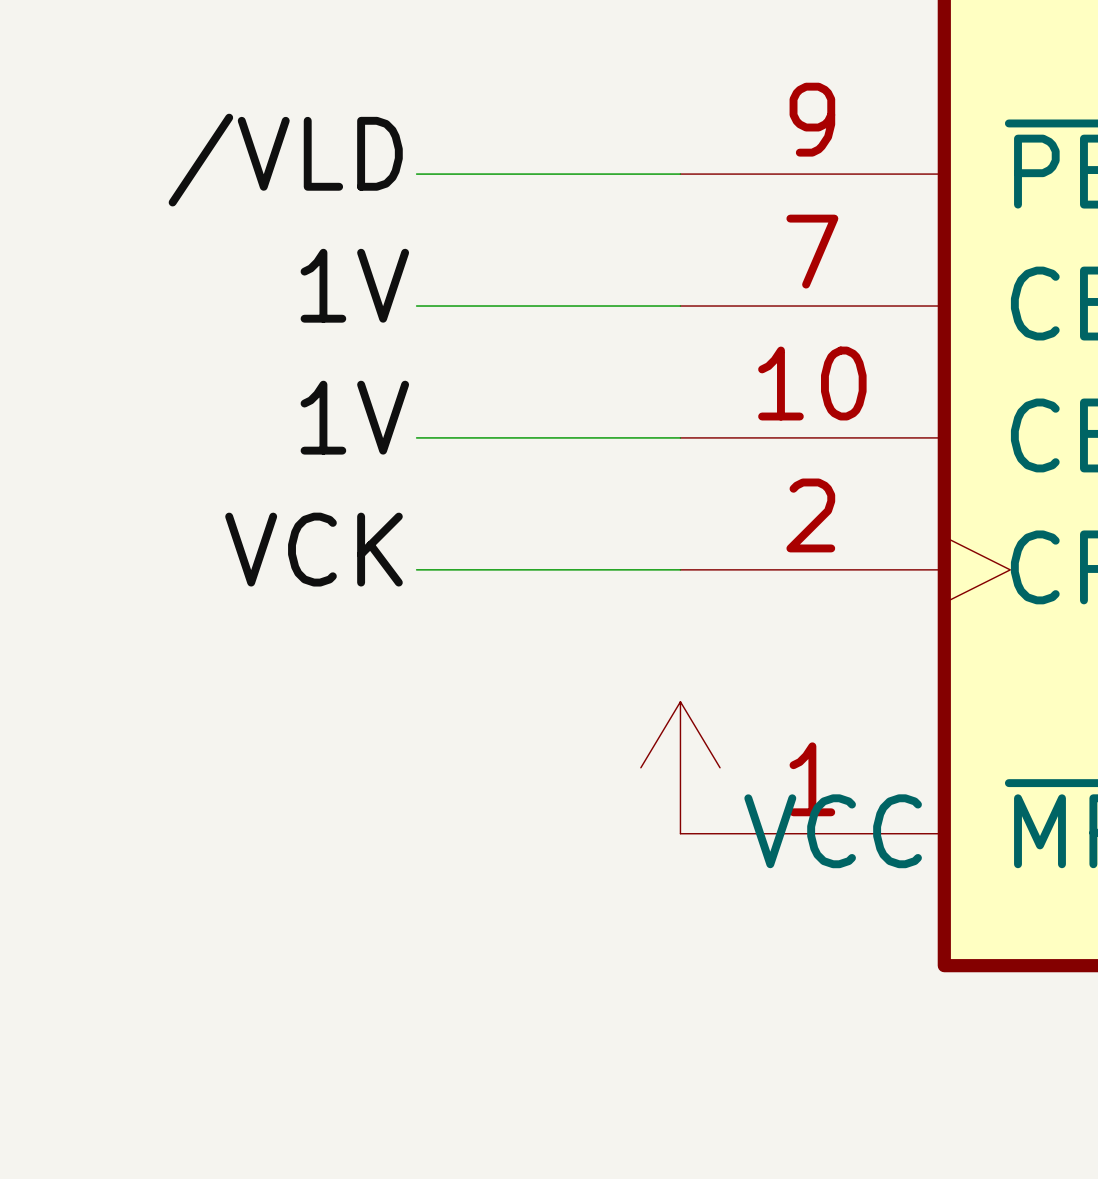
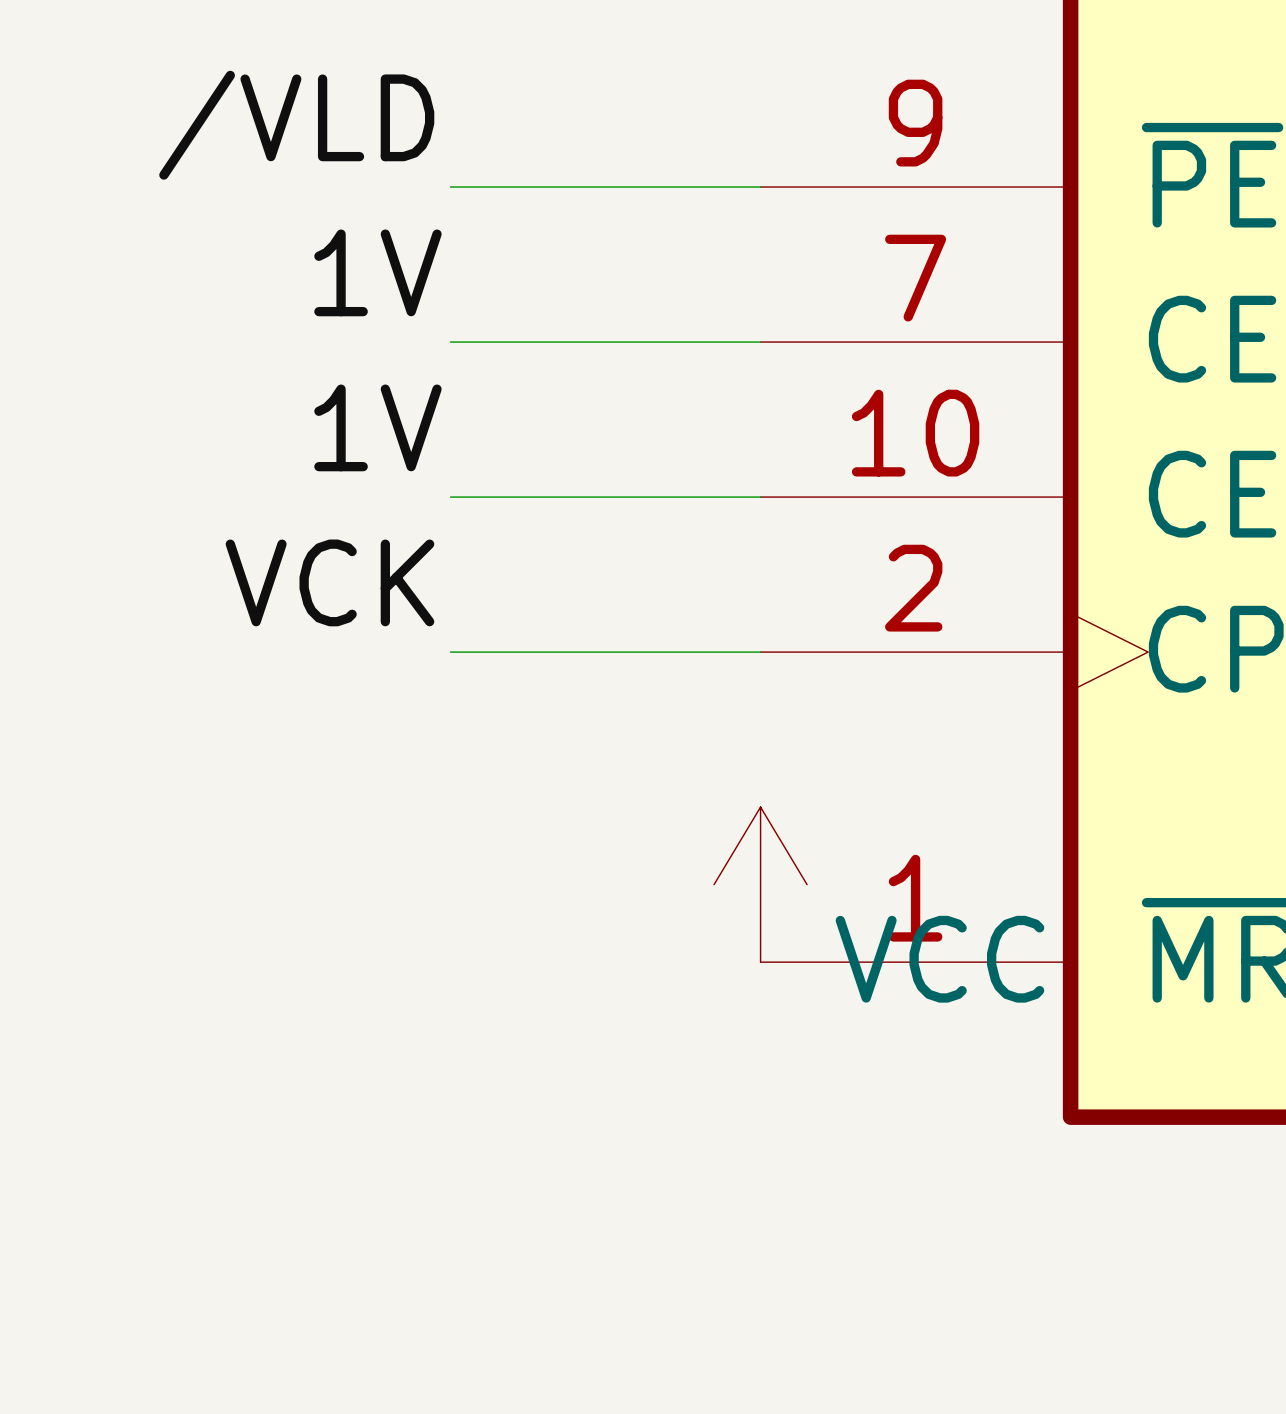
label position: /VLD (285, 160) -> /VLD (296, 125)
label position: 1V (354, 285) -> 1V (377, 272)
label position: 1V (354, 417) -> 1V (377, 427)
label position: VCK (314, 549) -> VCK (329, 582)

